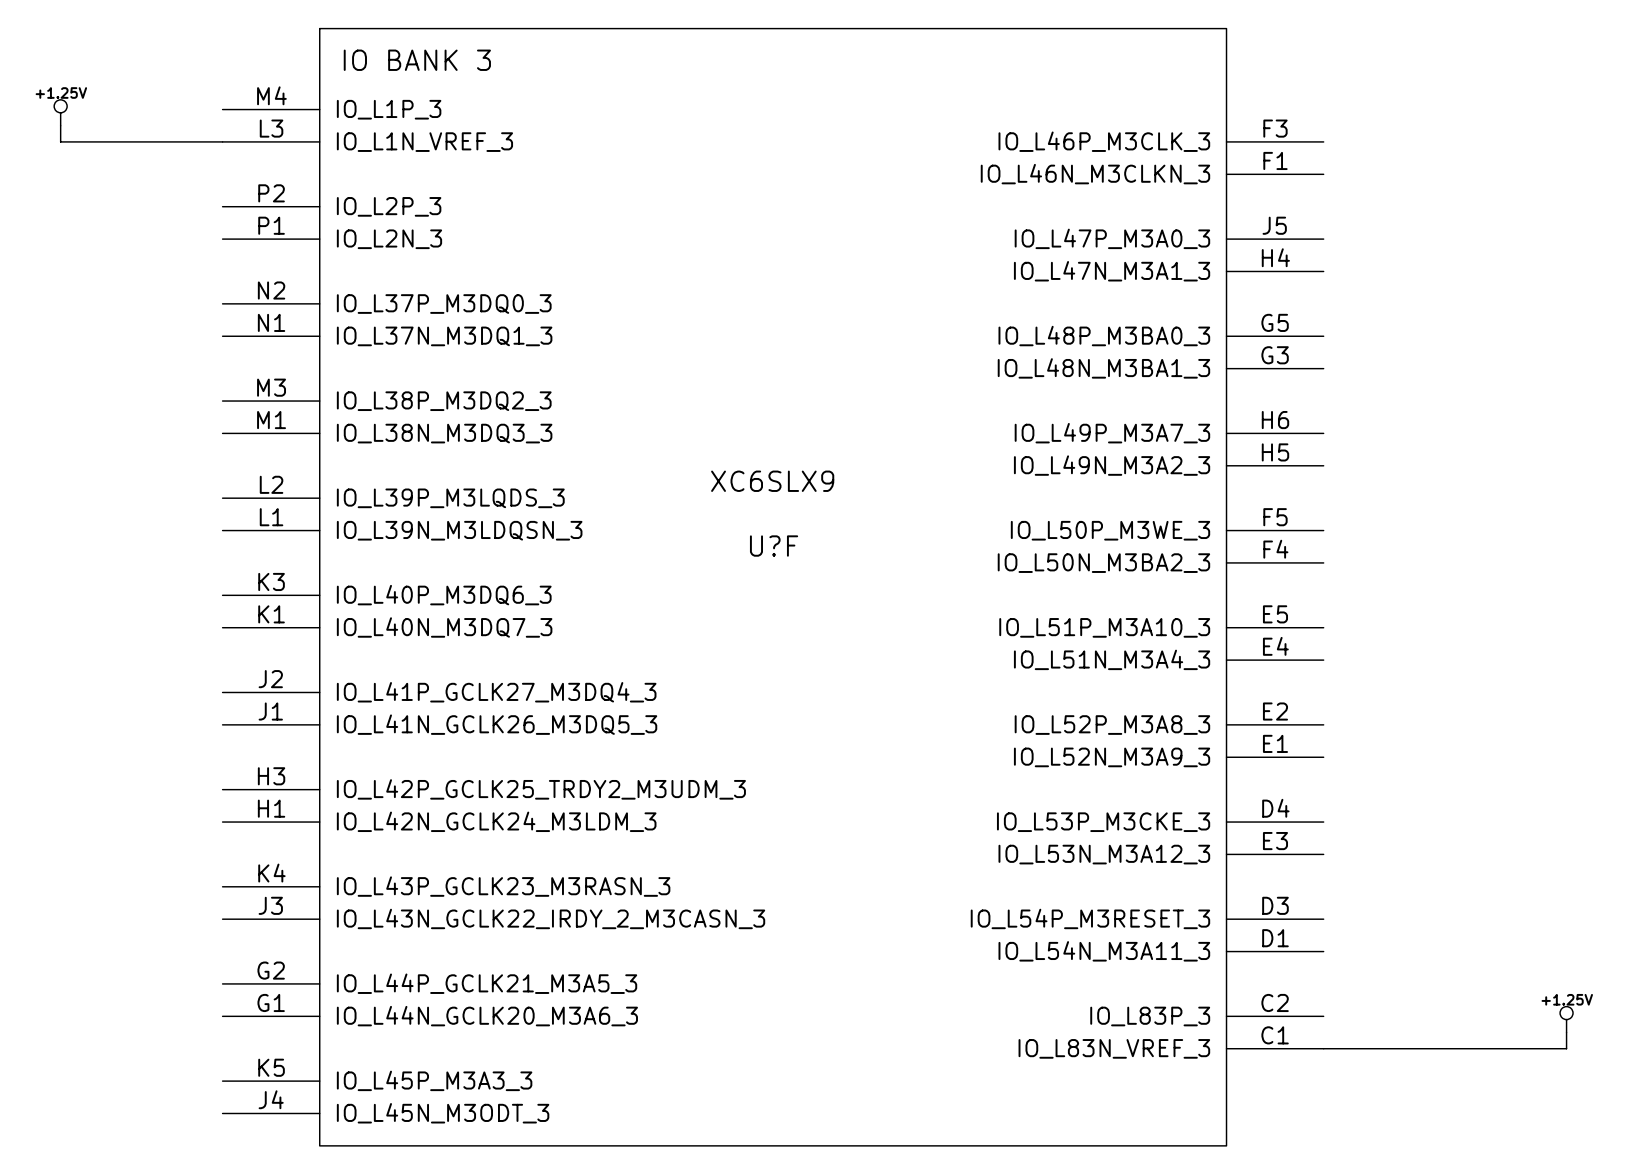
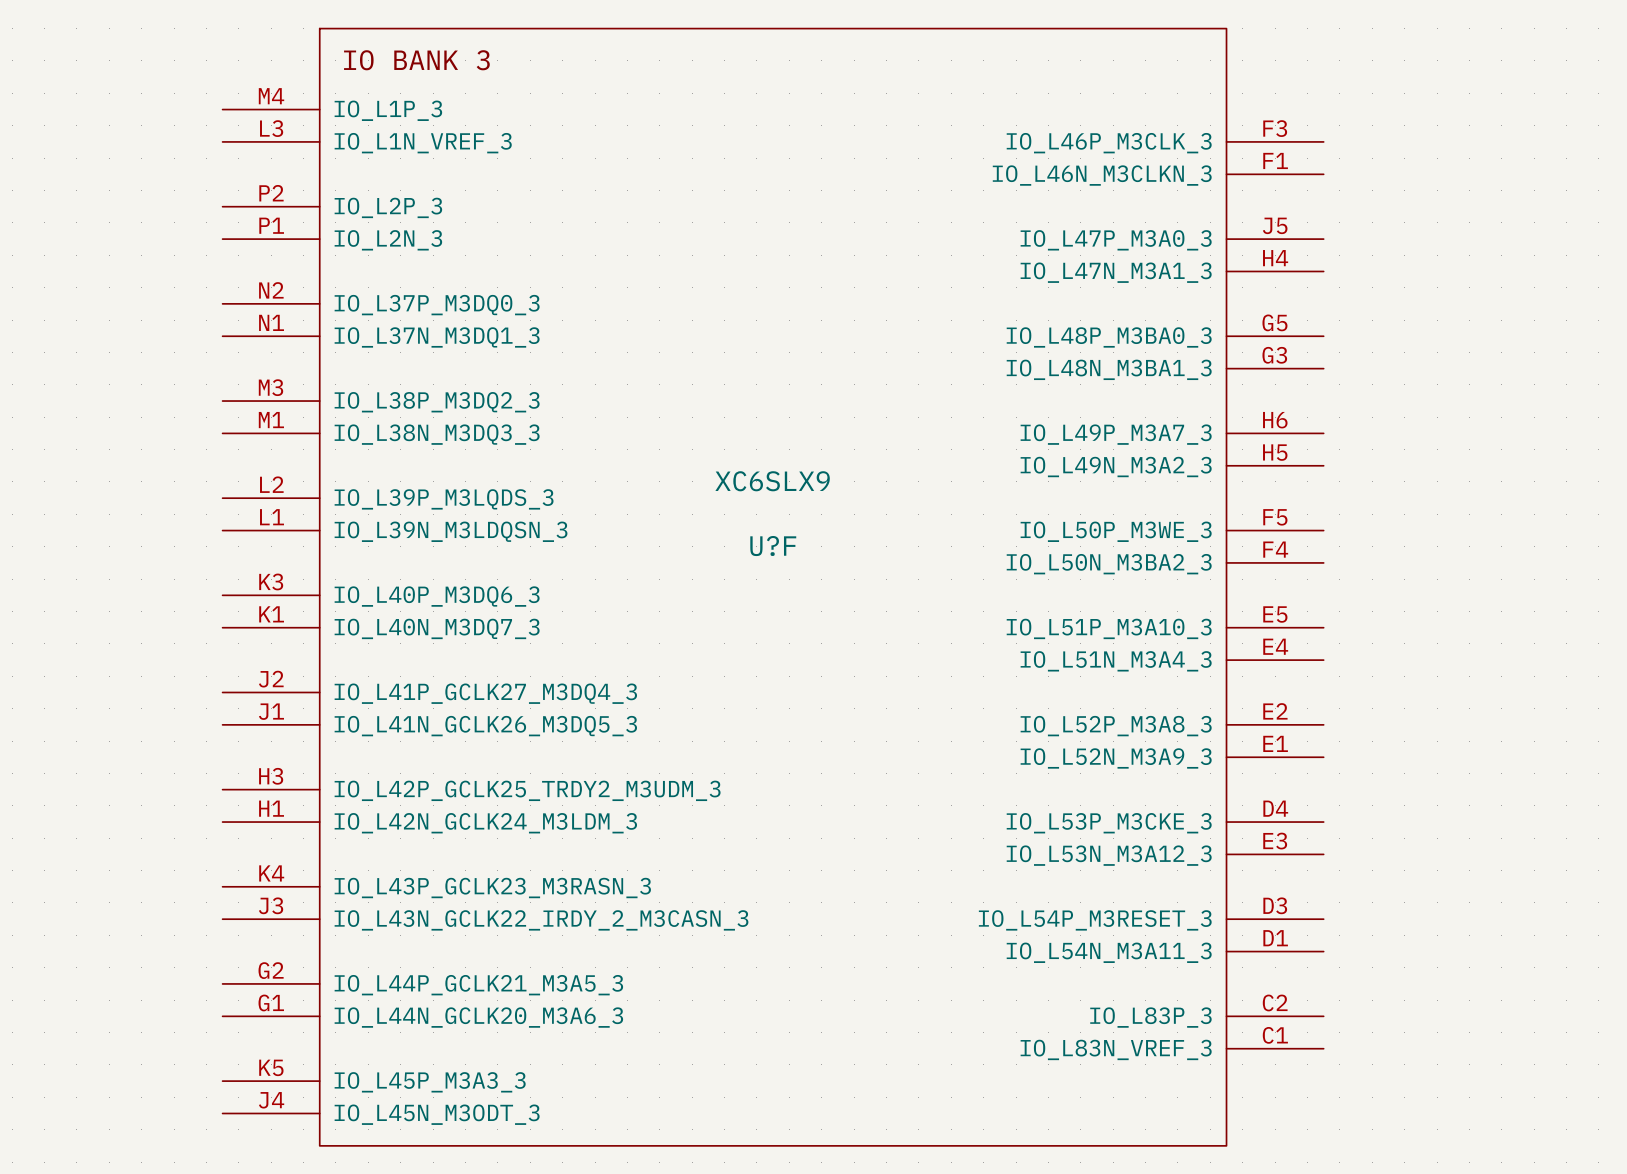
power symbol: +1.25V (60, 112) -> none
wire: (60, 125) (60, 141) (222, 141) -> none
power symbol: +1.25V (1566, 1019) -> none
wire: (1566, 1032) (1566, 1048) (1323, 1048) -> none

